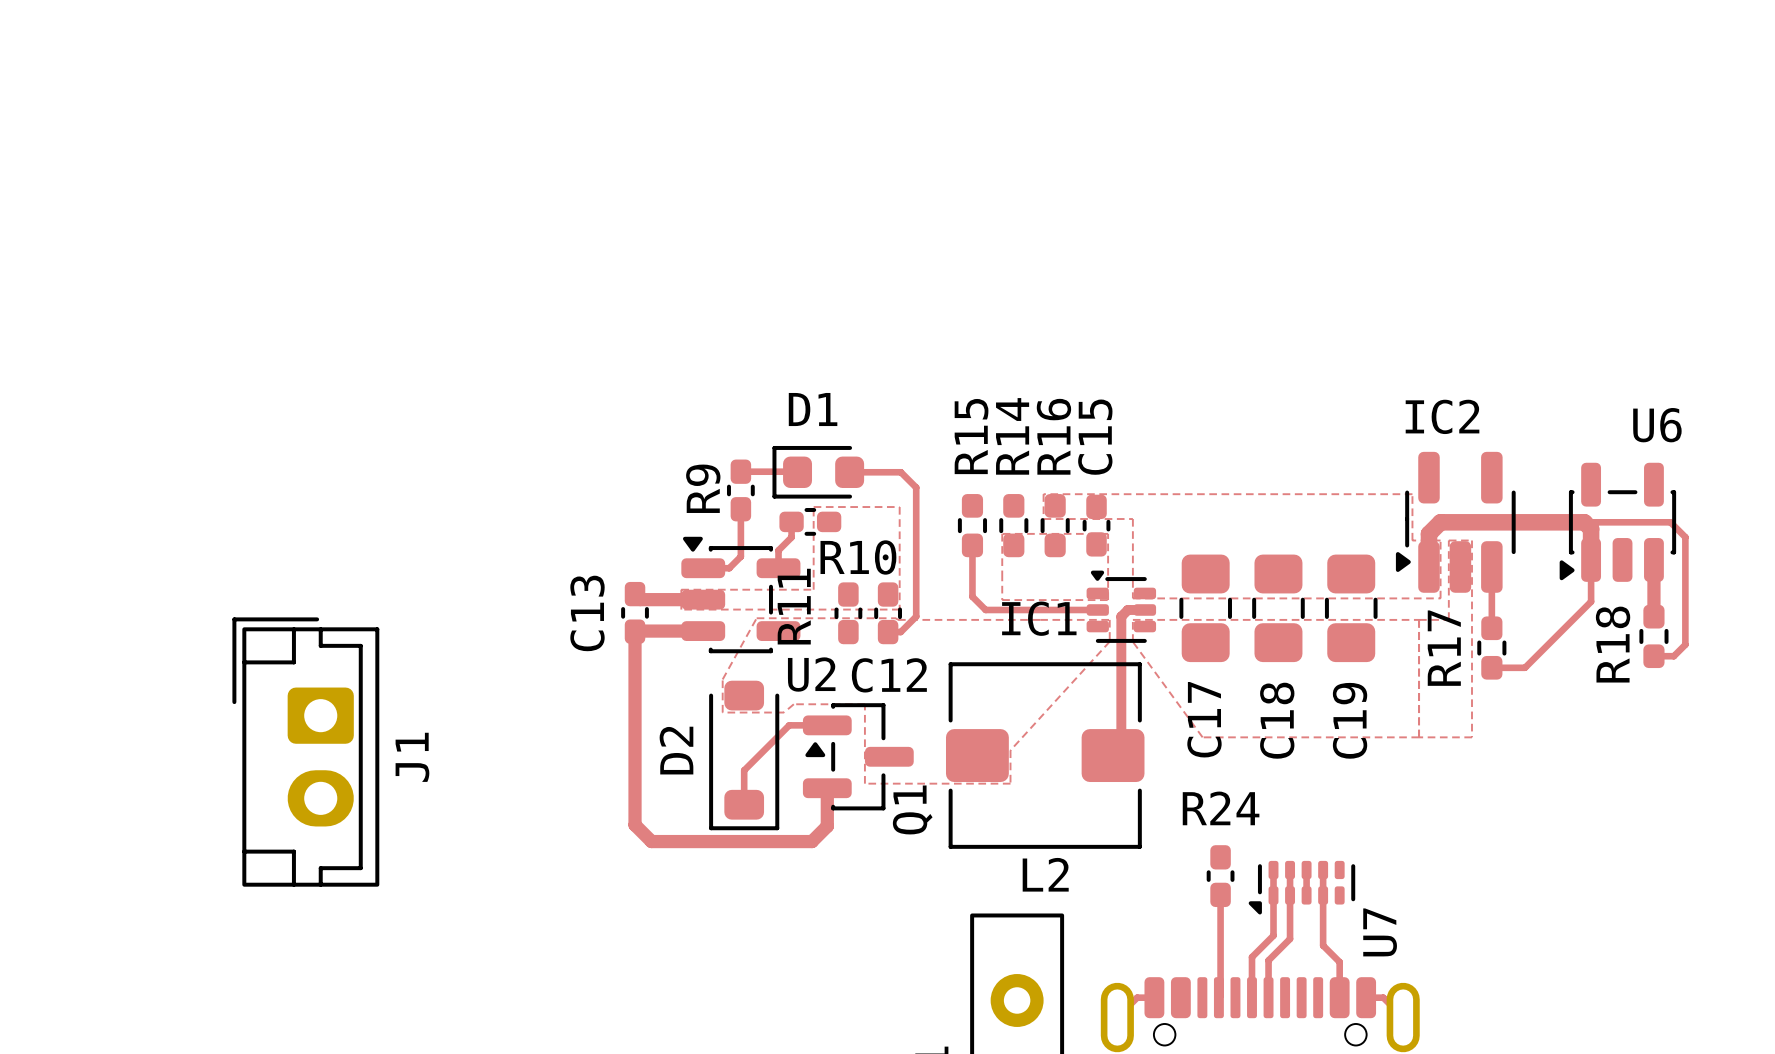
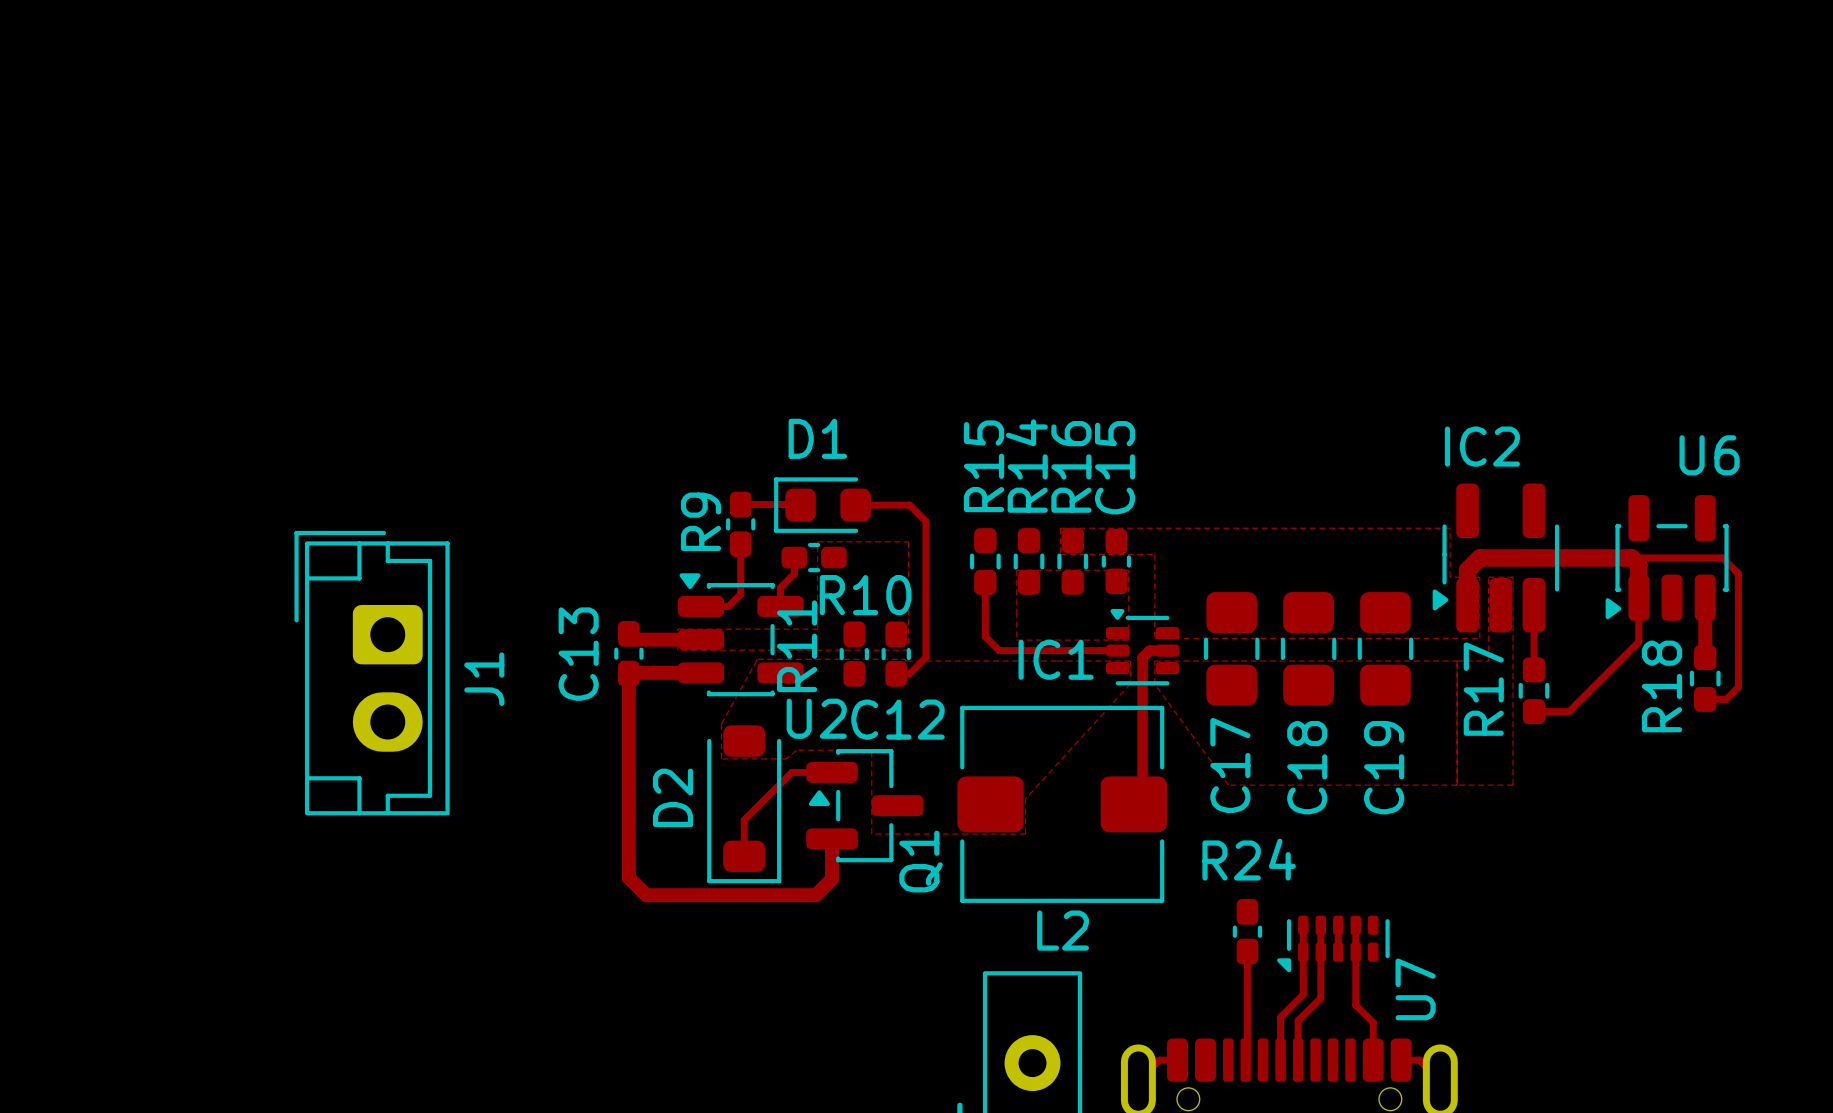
J1 position: (305, 752) -> (372, 673)

